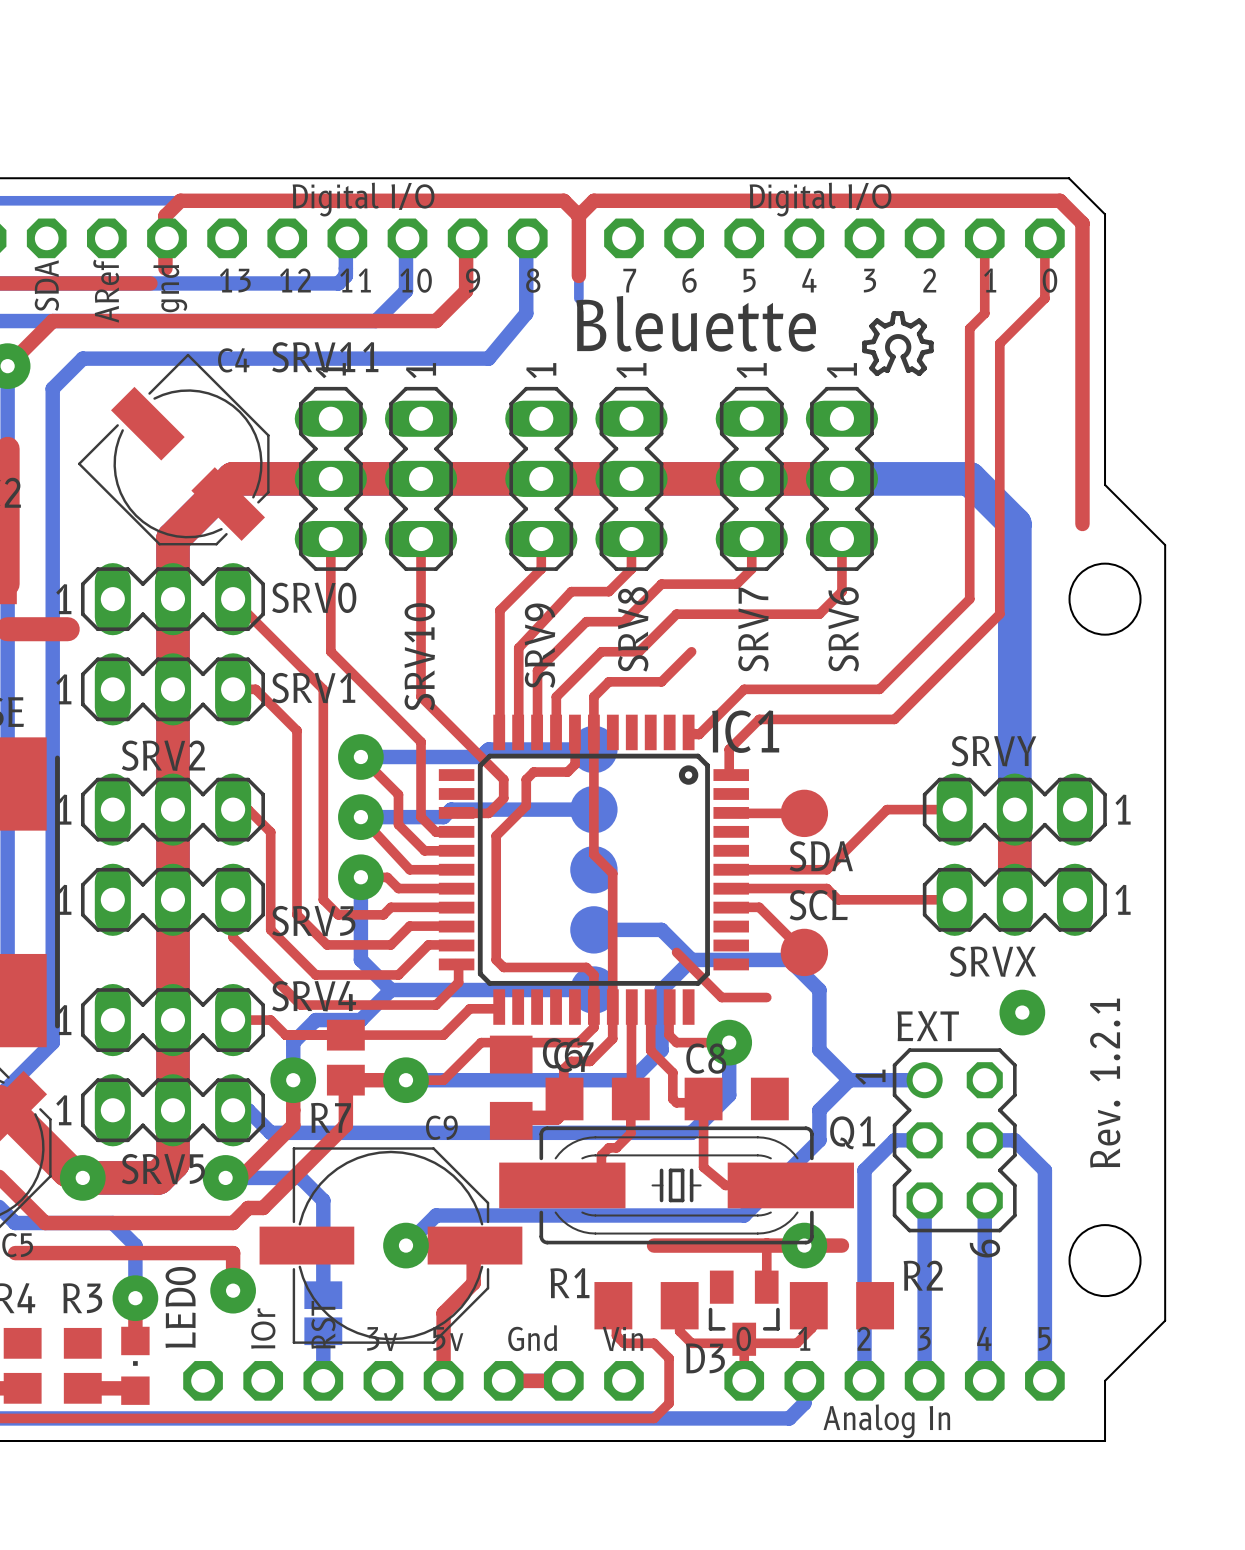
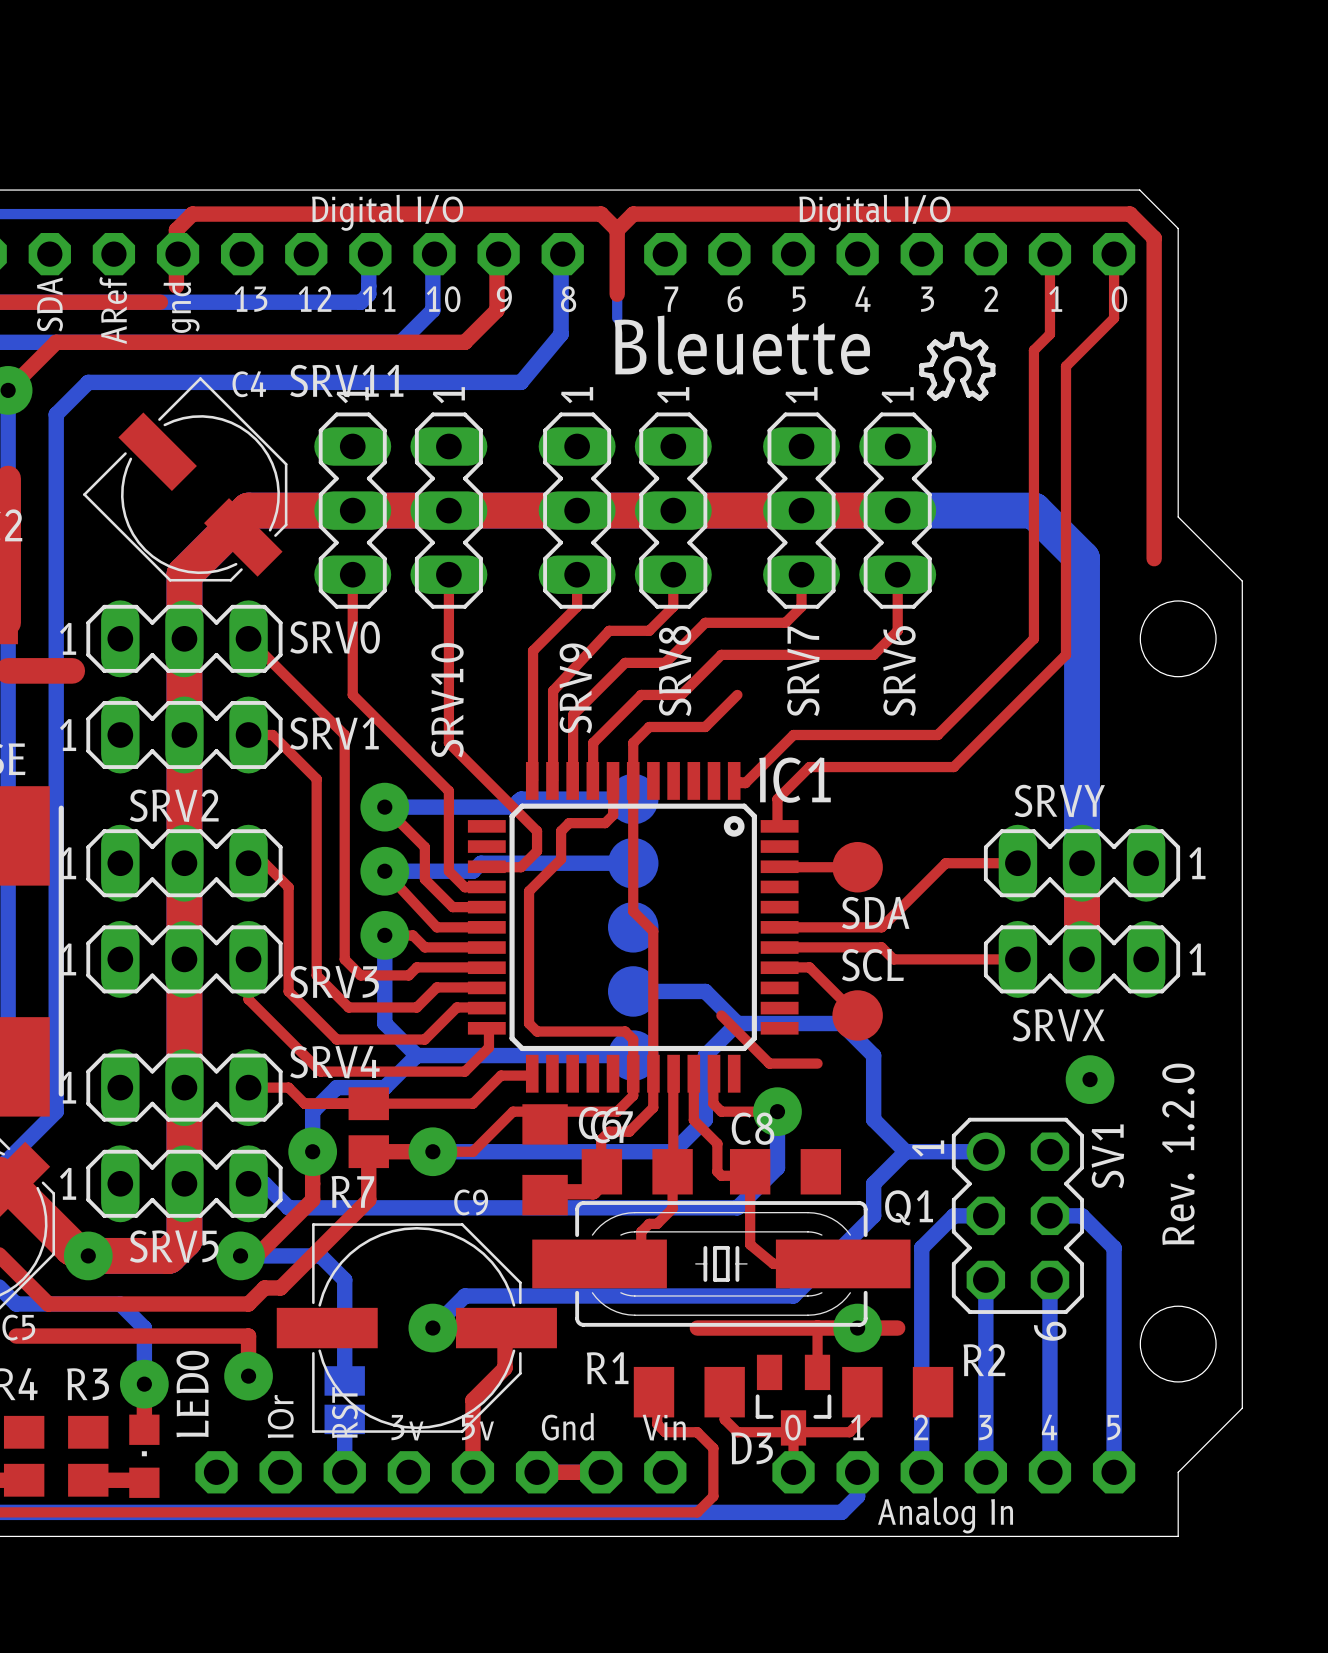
EXT name: EXT (928, 1026) -> SV1 (1107, 1156)
text: Rev. 1.2.1 (1105, 1083) -> Rev. 1.2.0 (1178, 1154)

